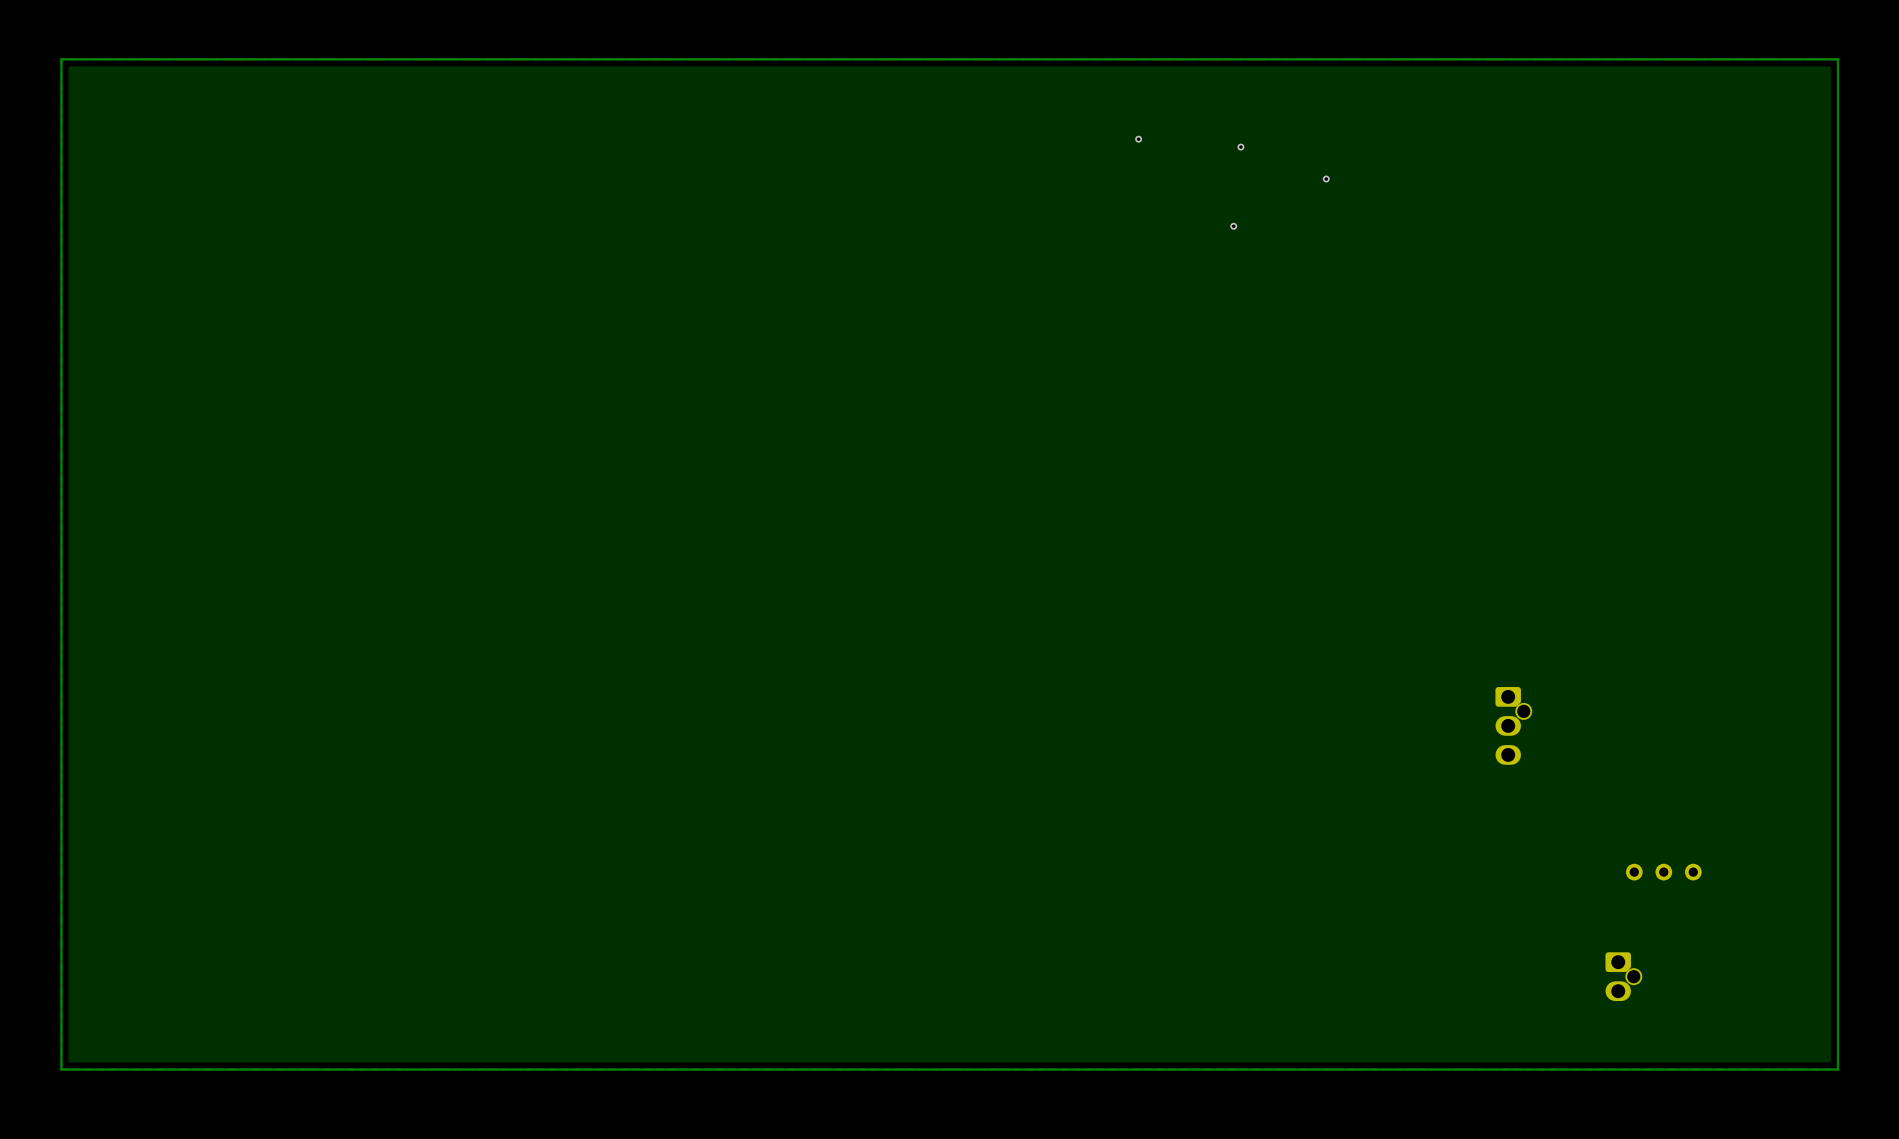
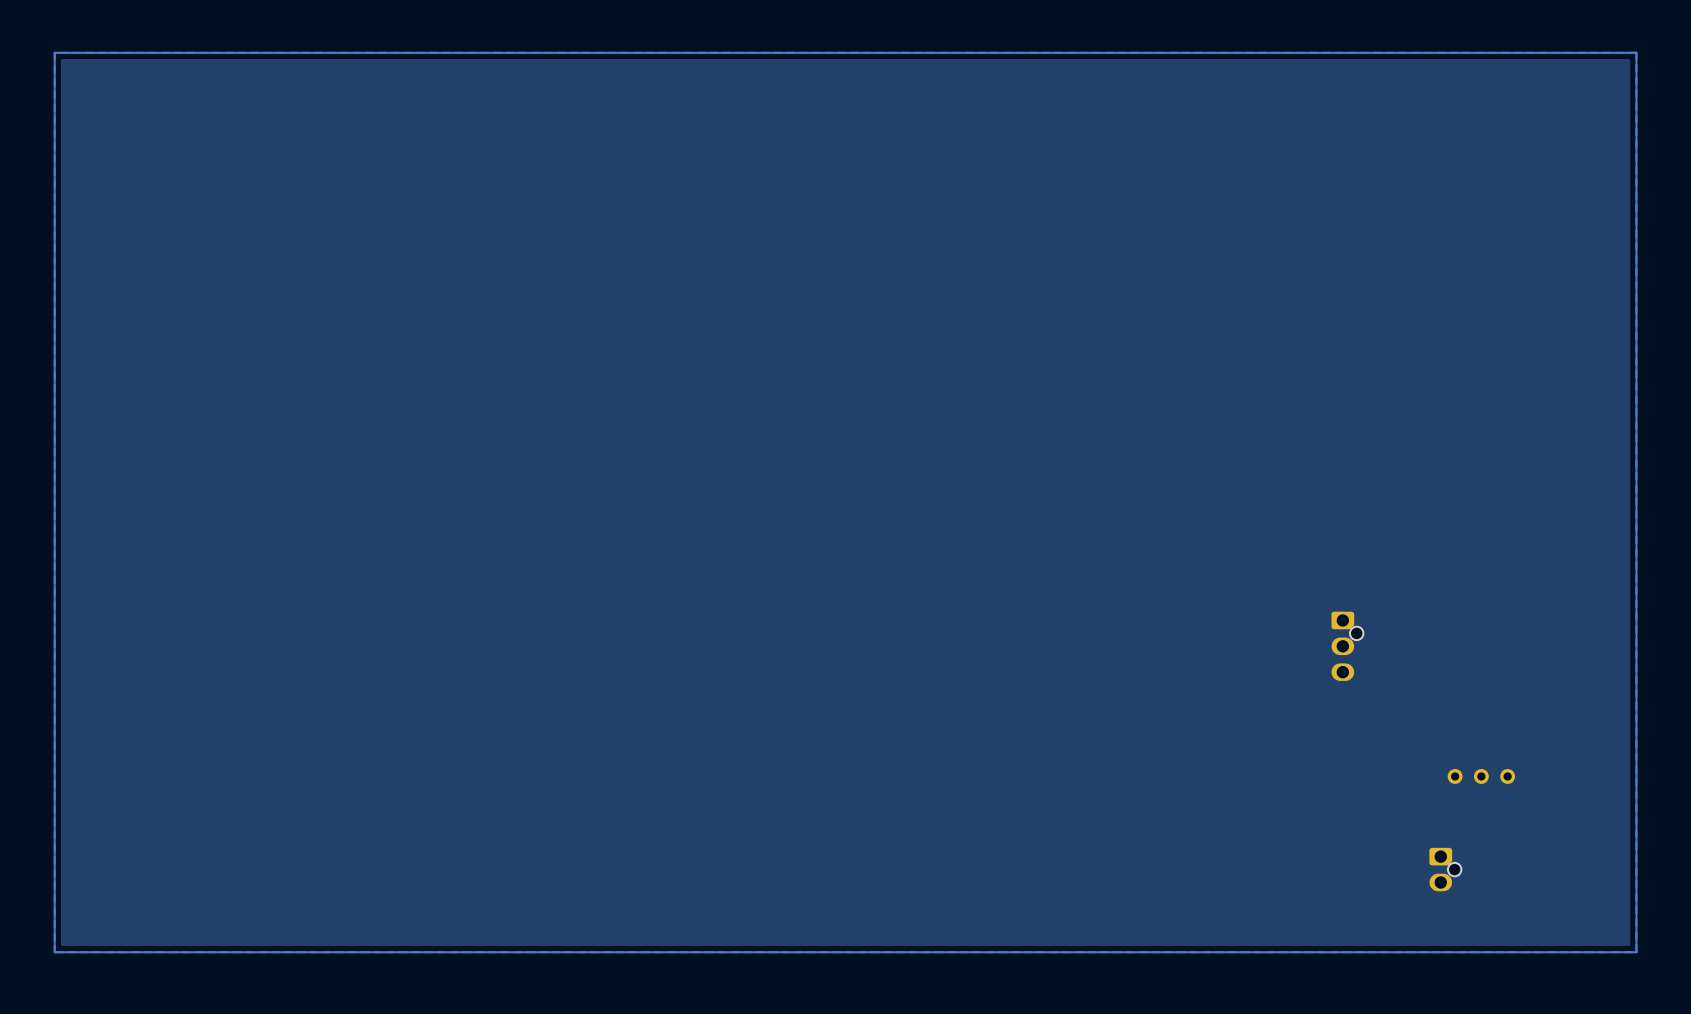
via: (1138, 139) -> none
via: (1240, 147) -> none
via: (1326, 179) -> none
via: (1233, 226) -> none

